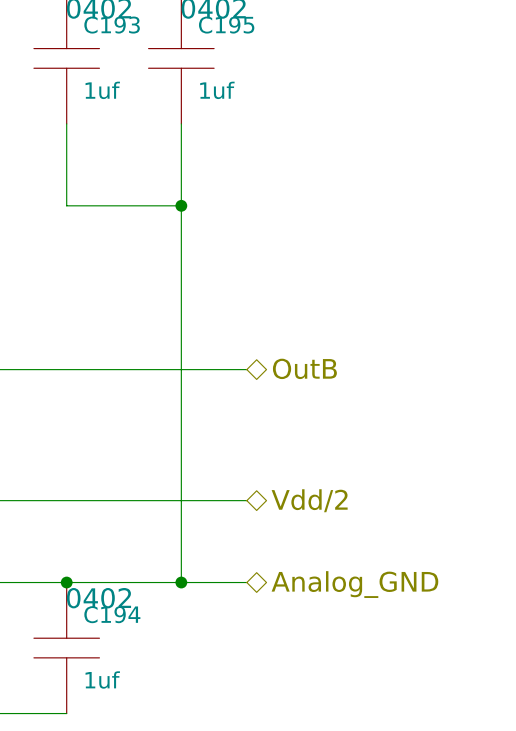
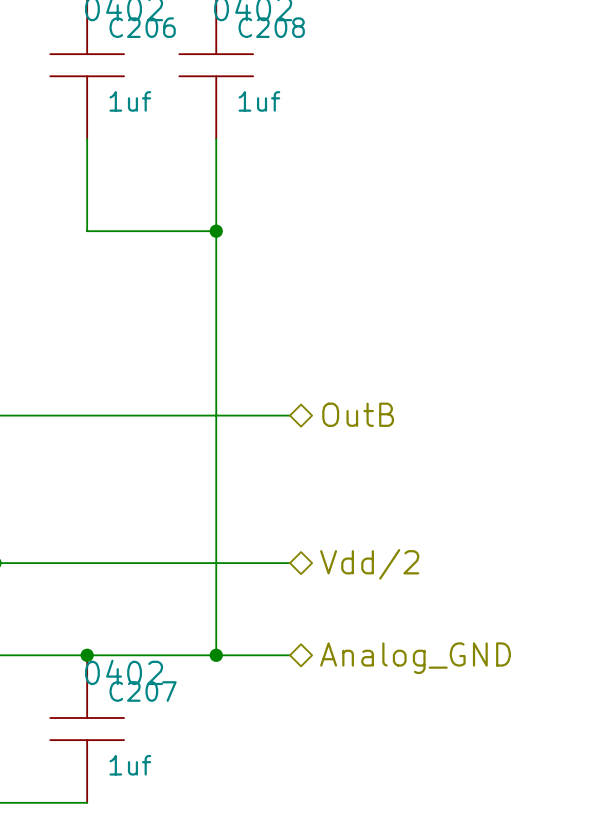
C193 name: C193 (112, 25) -> C206 (142, 27)
C195 name: C195 (226, 25) -> C208 (271, 27)
C194 name: C194 (112, 614) -> C207 (143, 691)

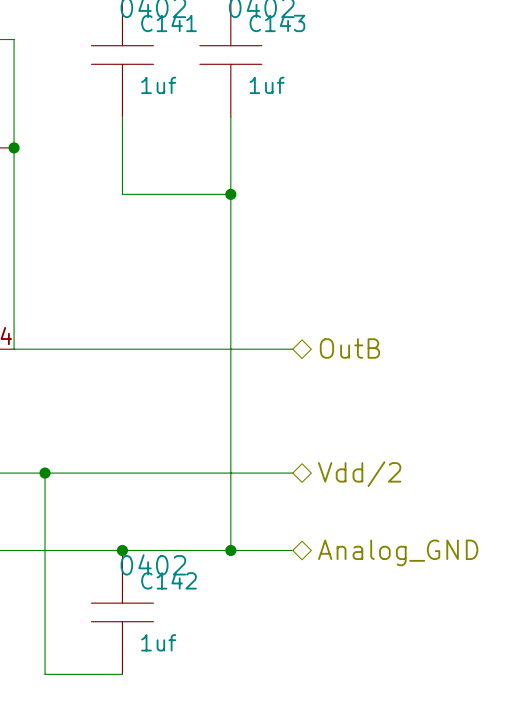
C206 name: C206 (142, 27) -> C141 (169, 23)
C208 name: C208 (271, 27) -> C143 (277, 23)
C207 name: C207 (143, 691) -> C142 (169, 580)

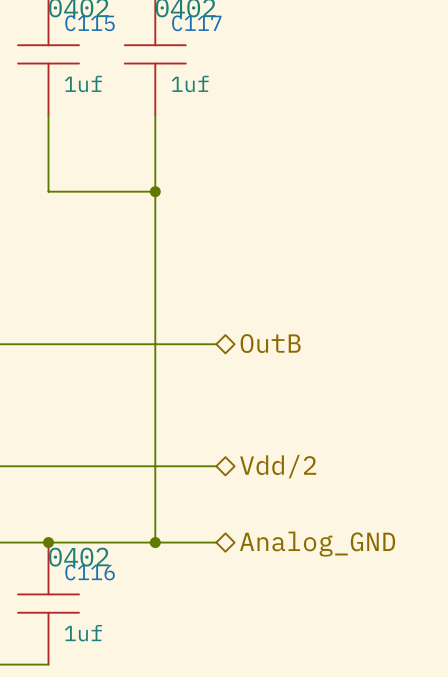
C141 name: C141 (169, 23) -> C115 (90, 23)
C143 name: C143 (277, 23) -> C117 (196, 23)
C142 name: C142 (169, 580) -> C116 (90, 572)

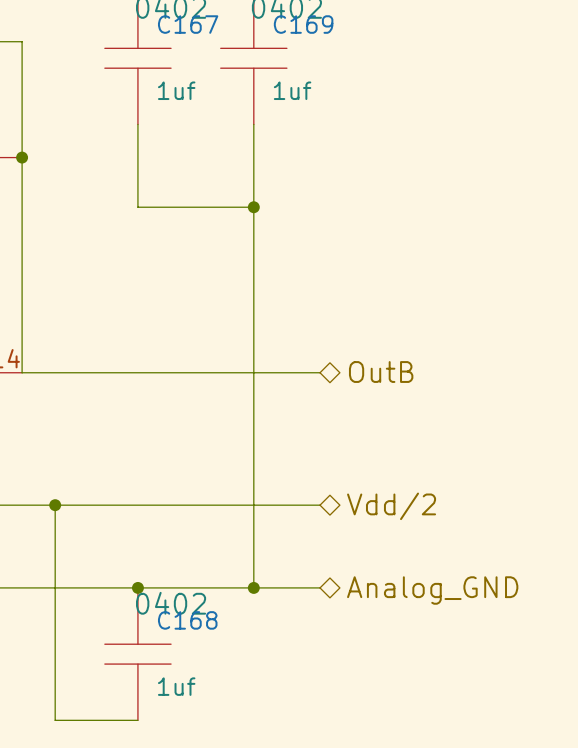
C115 name: C115 (90, 23) -> C167 (188, 24)
C117 name: C117 (196, 23) -> C169 (303, 24)
C116 name: C116 (90, 572) -> C168 (187, 620)

